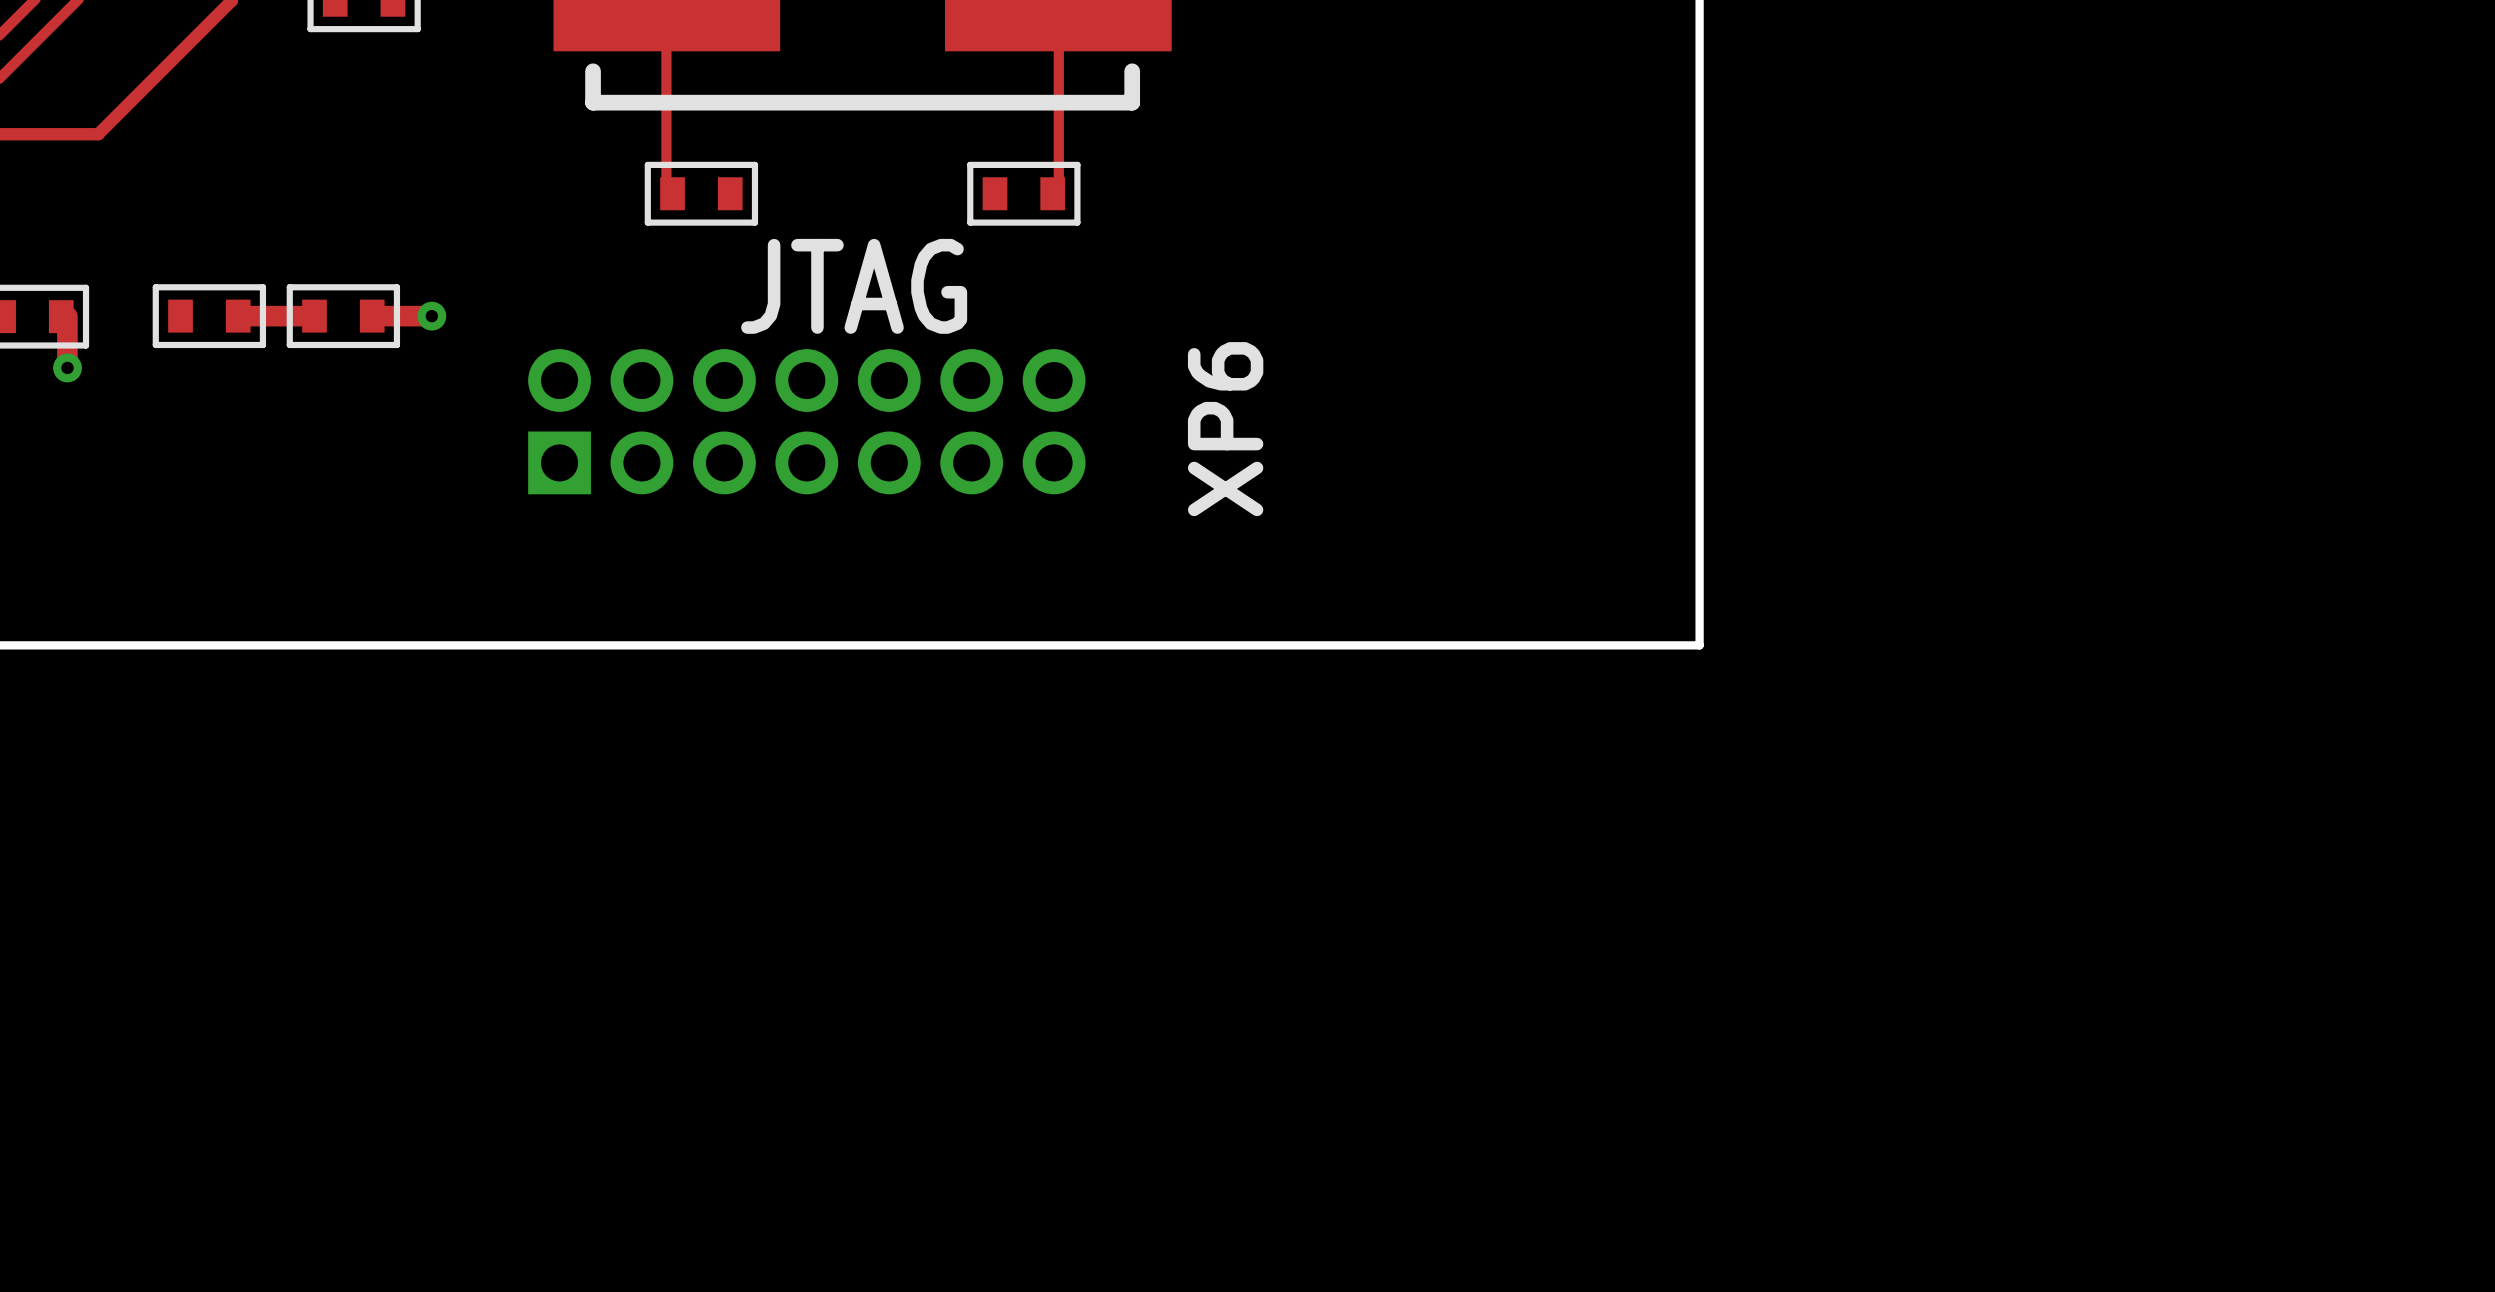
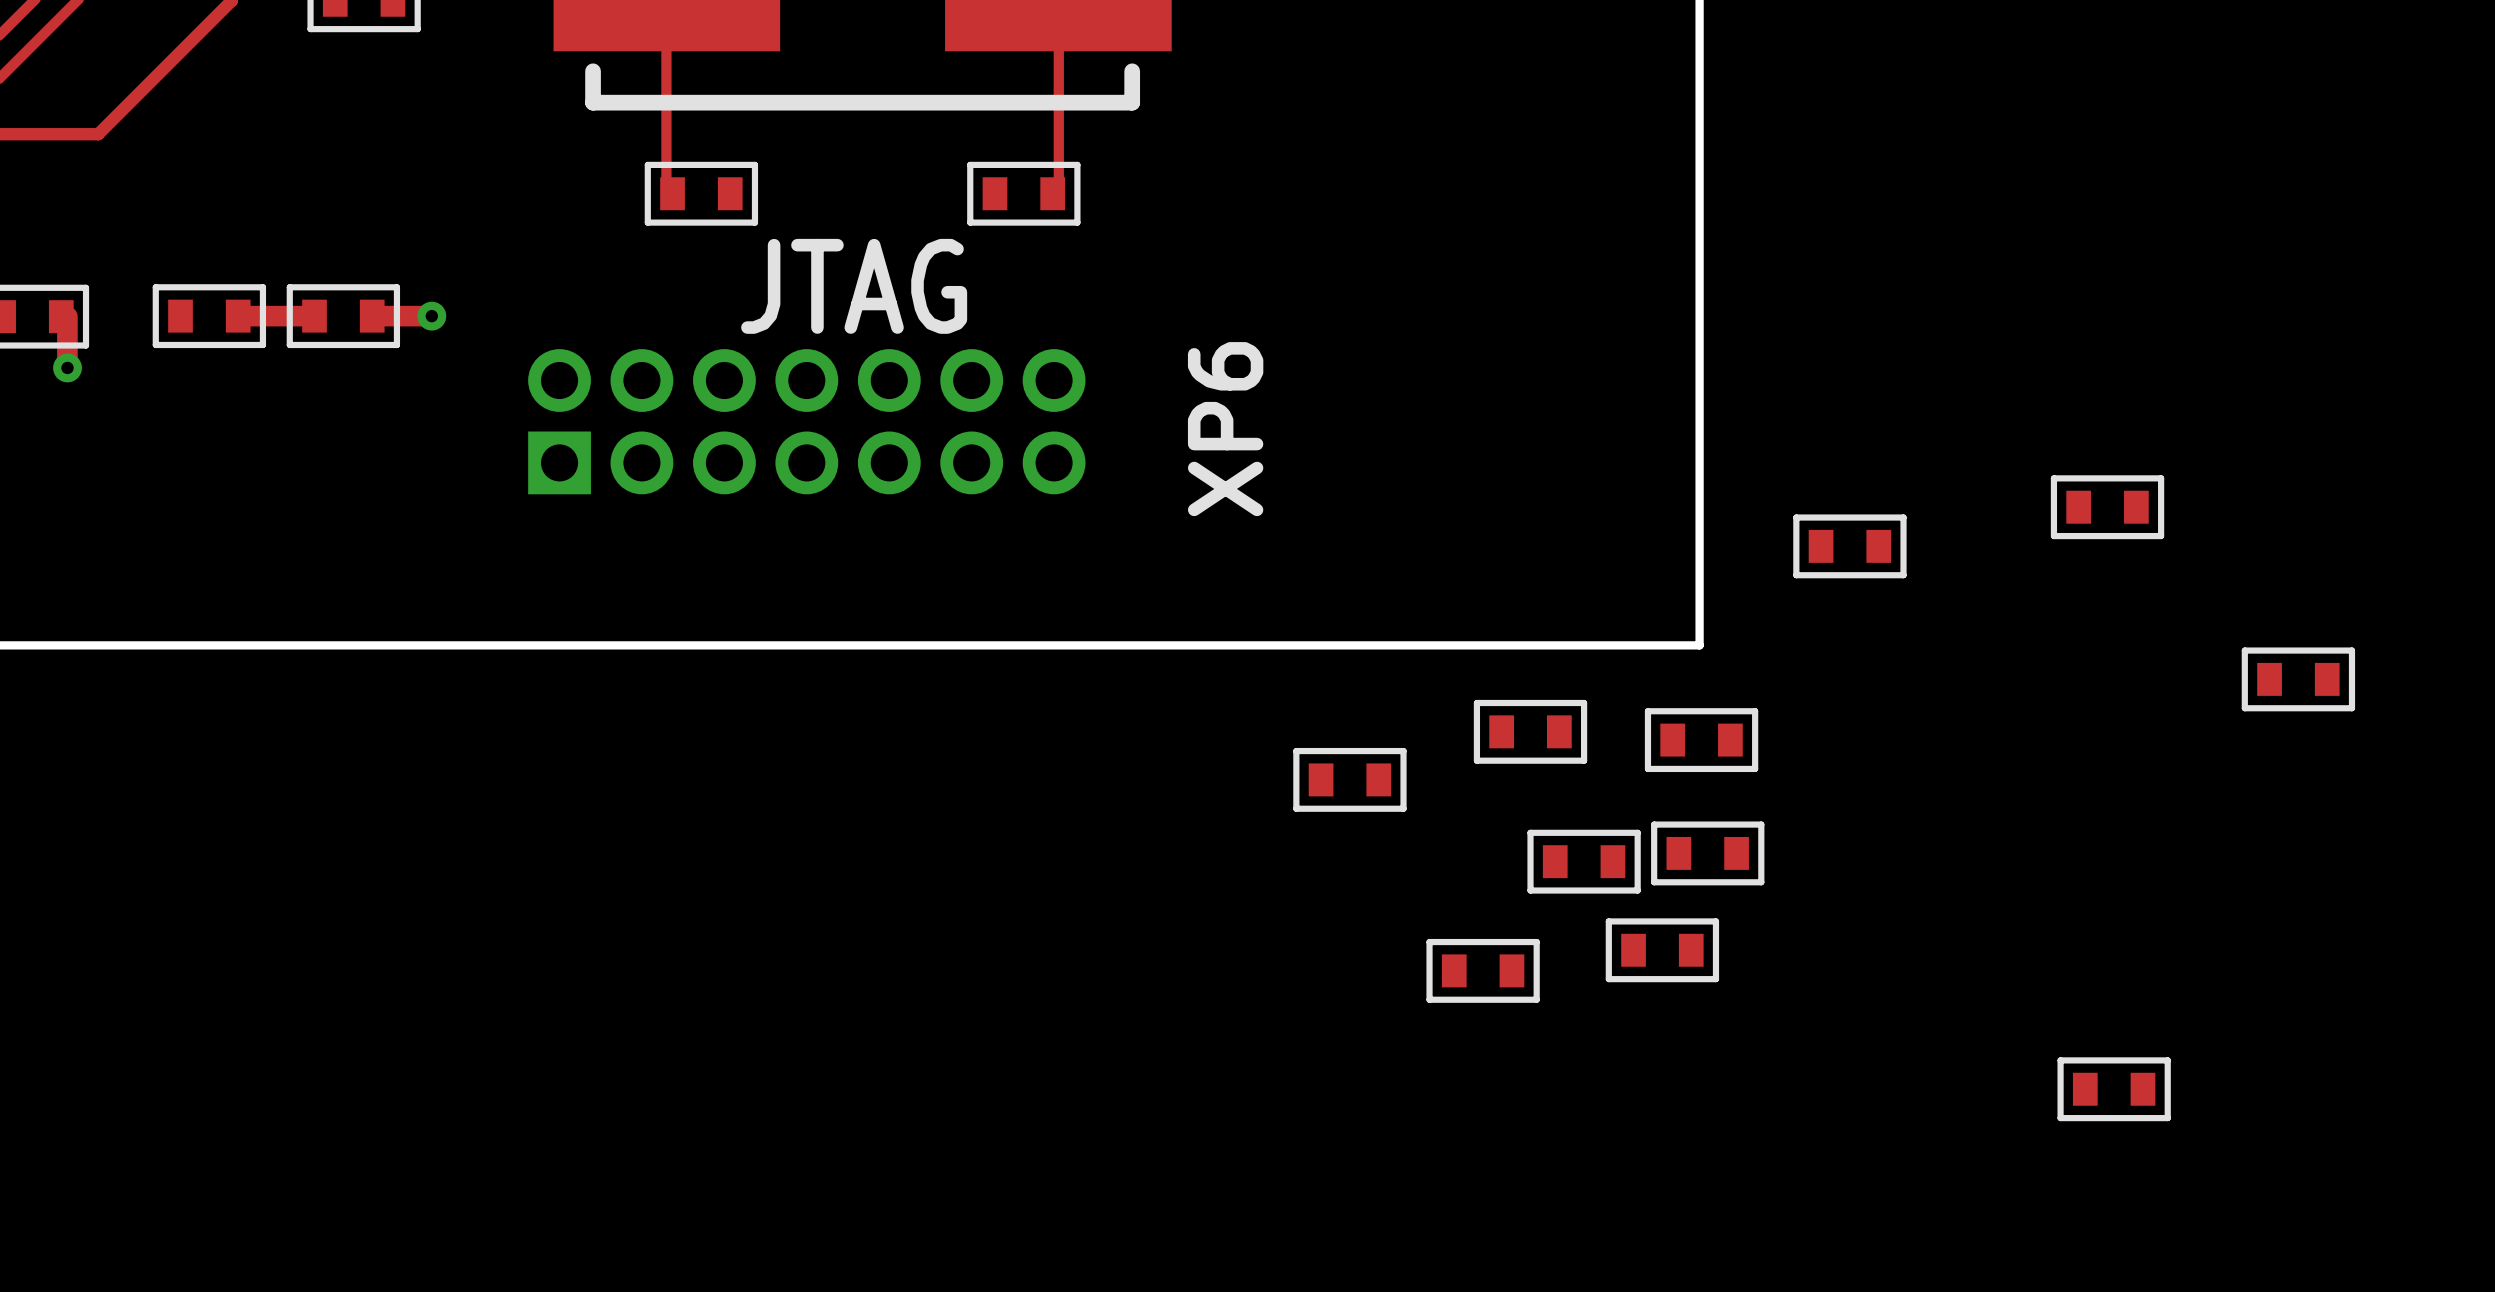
part: none -> (2107, 507)
part: none -> (1849, 546)
part: none -> (2298, 679)
part: none -> (1530, 731)
part: none -> (1701, 740)
part: none -> (1349, 779)
part: none -> (1707, 853)
part: none -> (1584, 861)
part: none -> (1662, 950)
part: none -> (1483, 970)
part: none -> (2114, 1089)

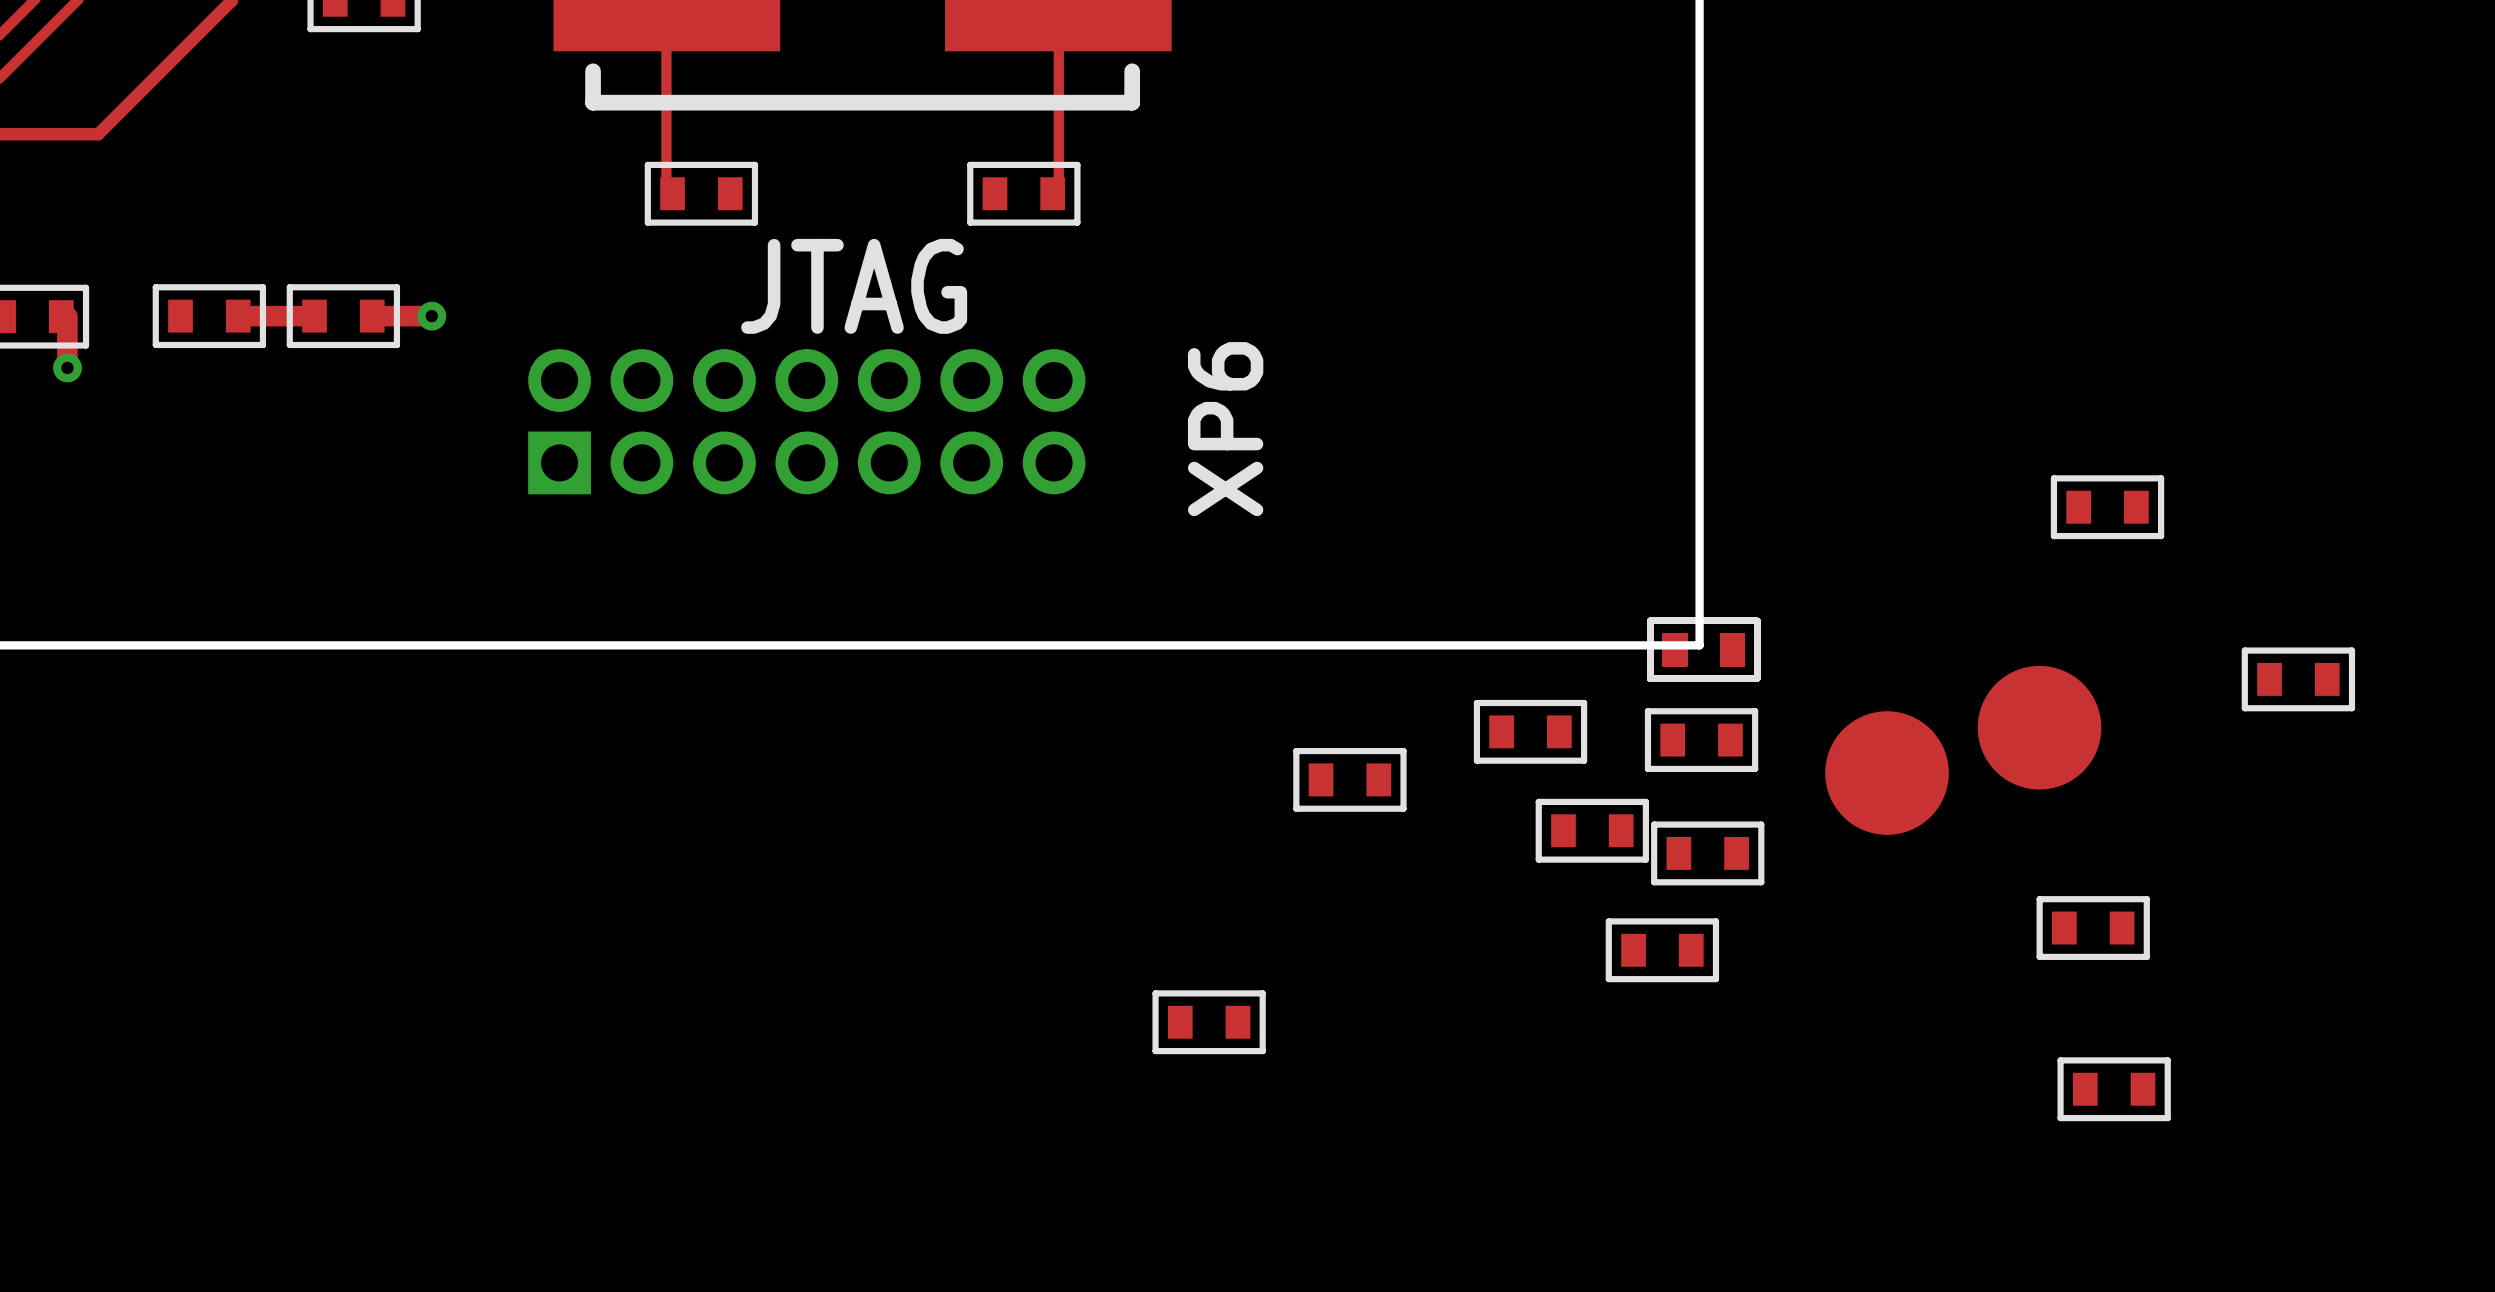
part position: (1849, 546) -> (1703, 649)
part: none -> (2039, 727)
part: none -> (1887, 773)
part position: (1584, 861) -> (1592, 830)
part: none -> (2093, 928)
part: (1483, 970) -> none
part: none -> (1209, 1022)

